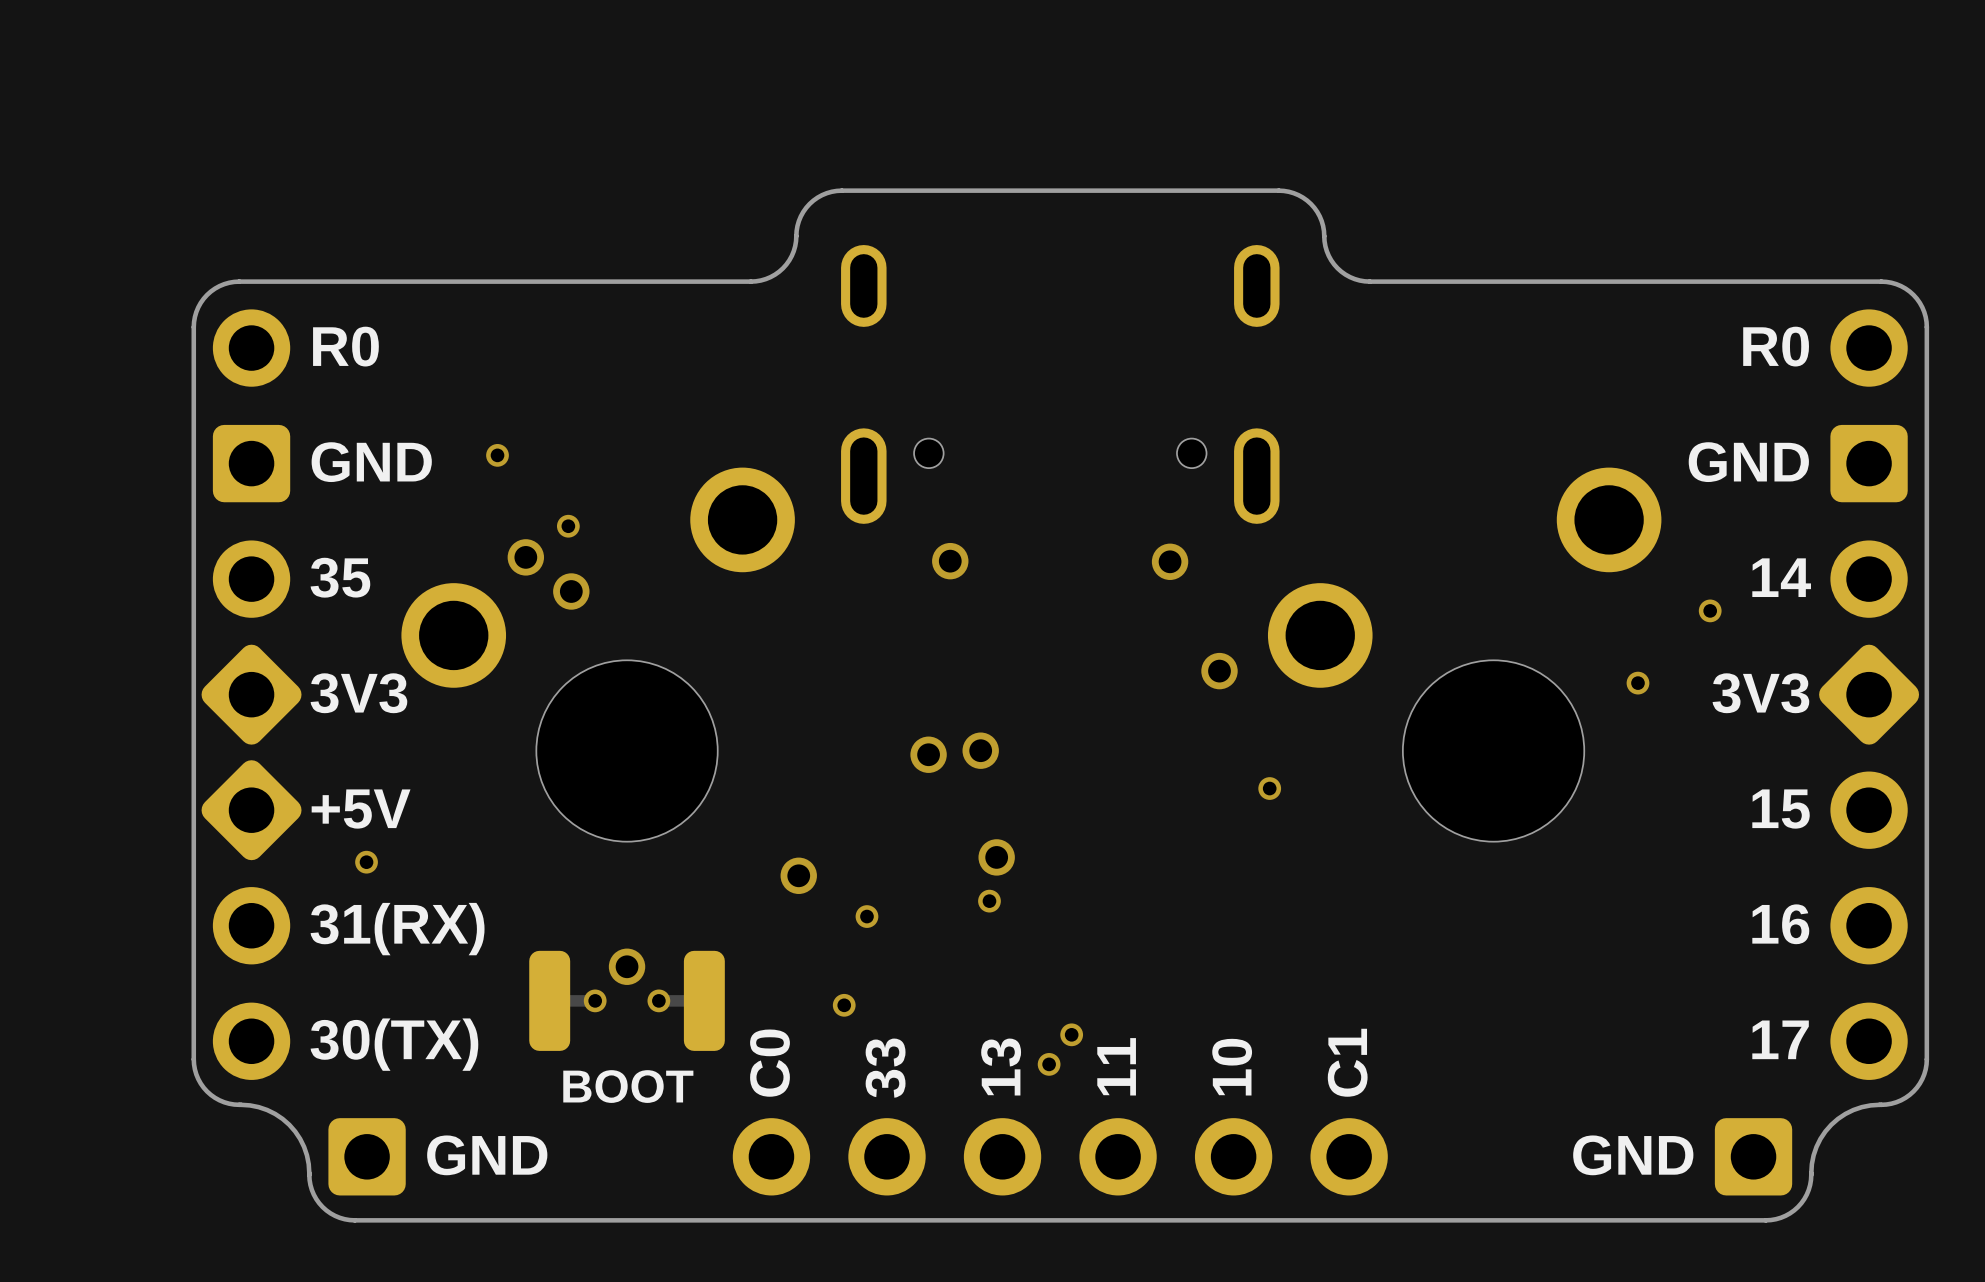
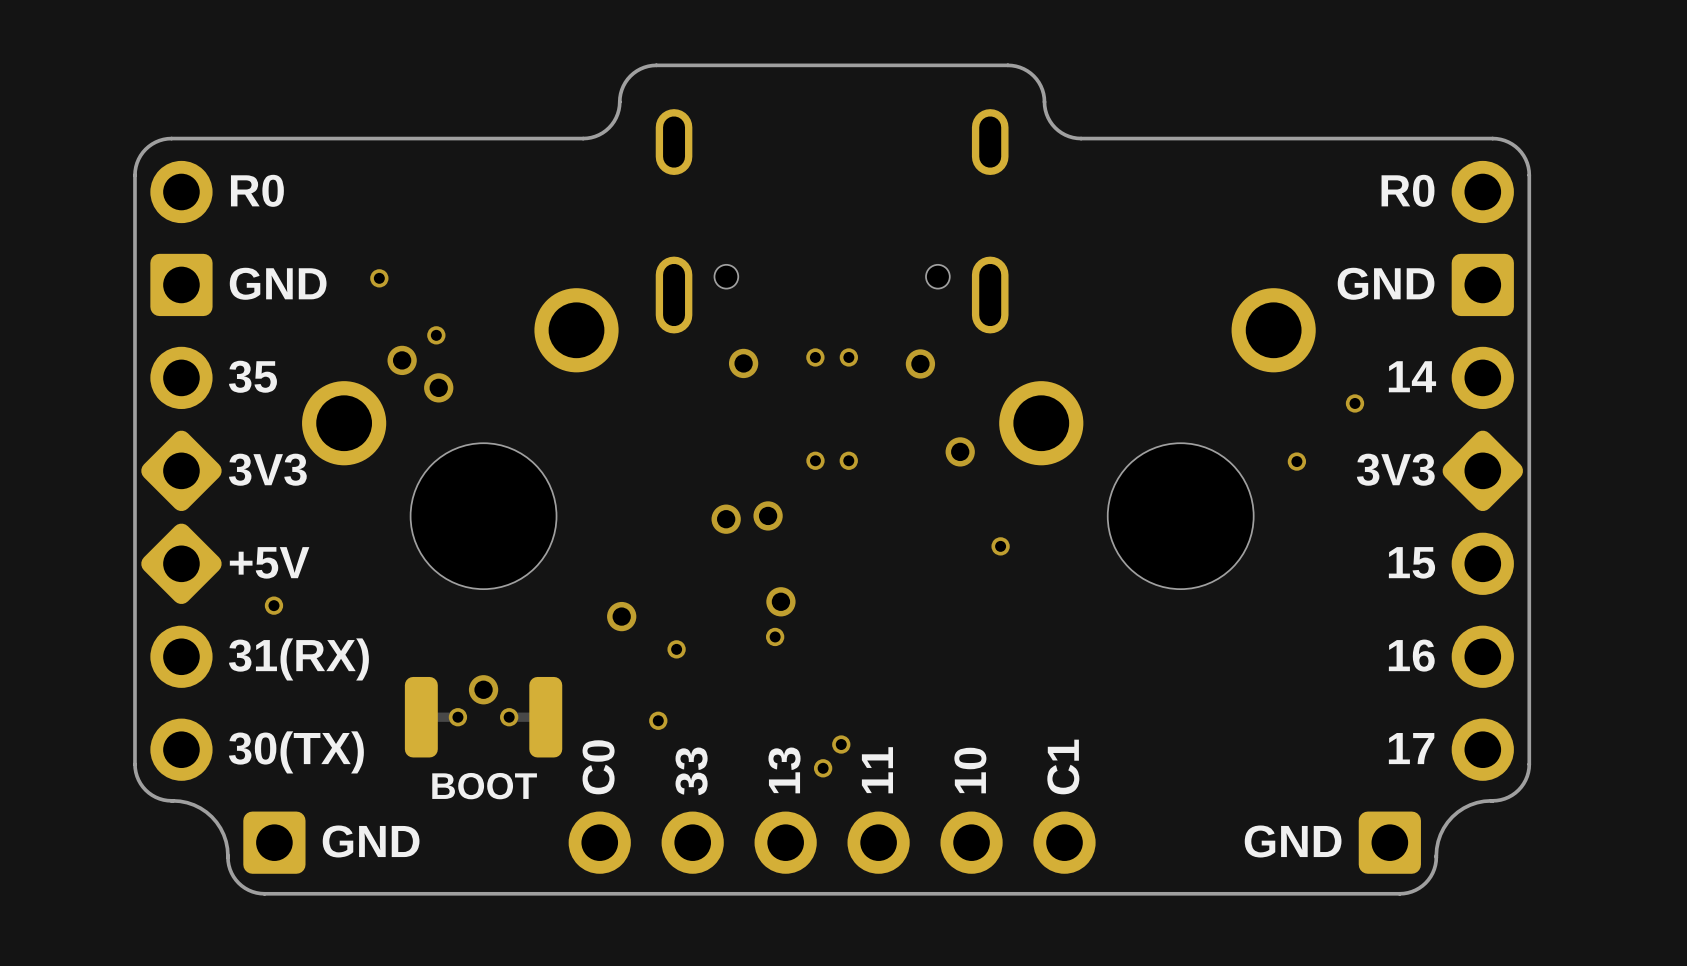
via: none -> (815, 357)
via: none -> (848, 357)
via: none -> (815, 460)
via: none -> (848, 460)

